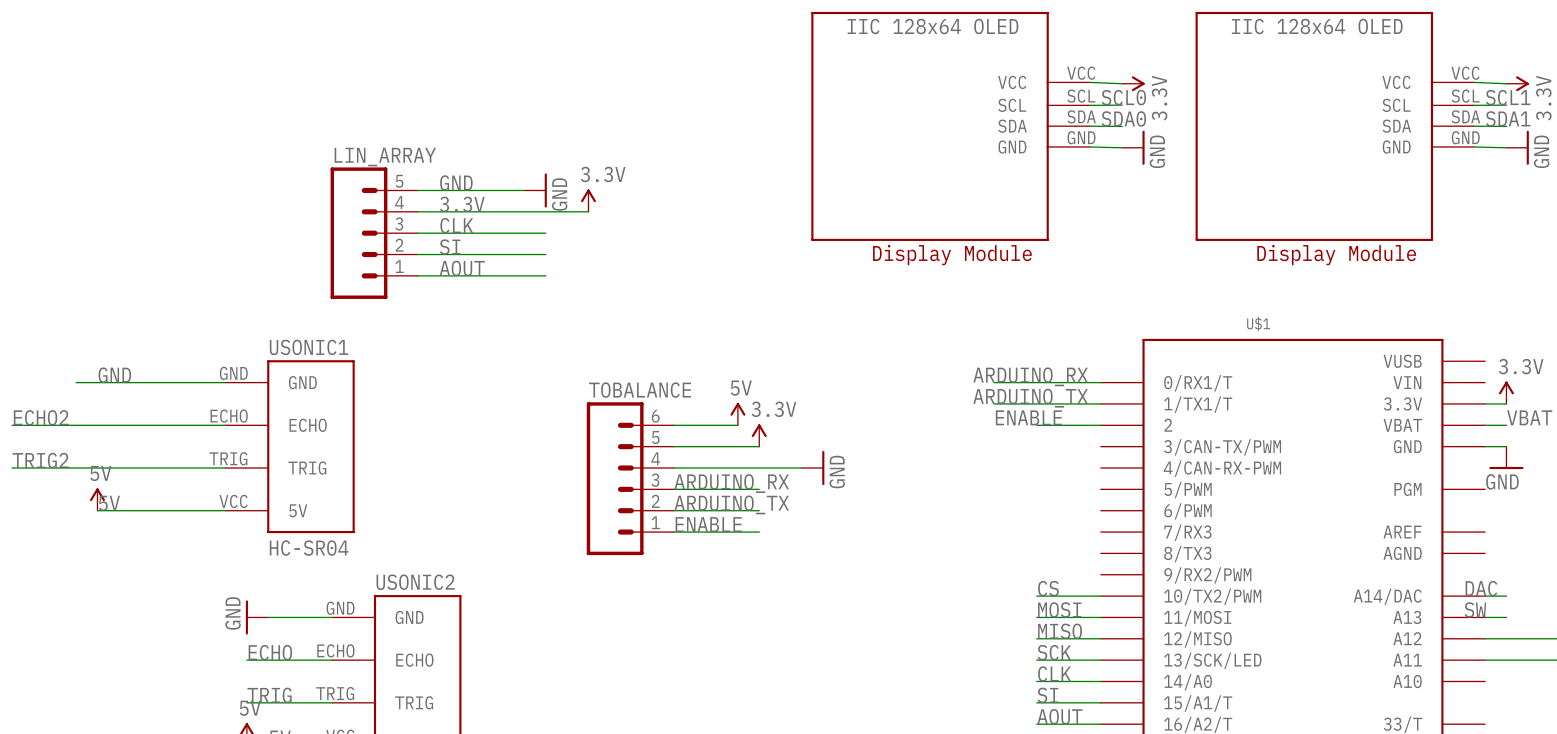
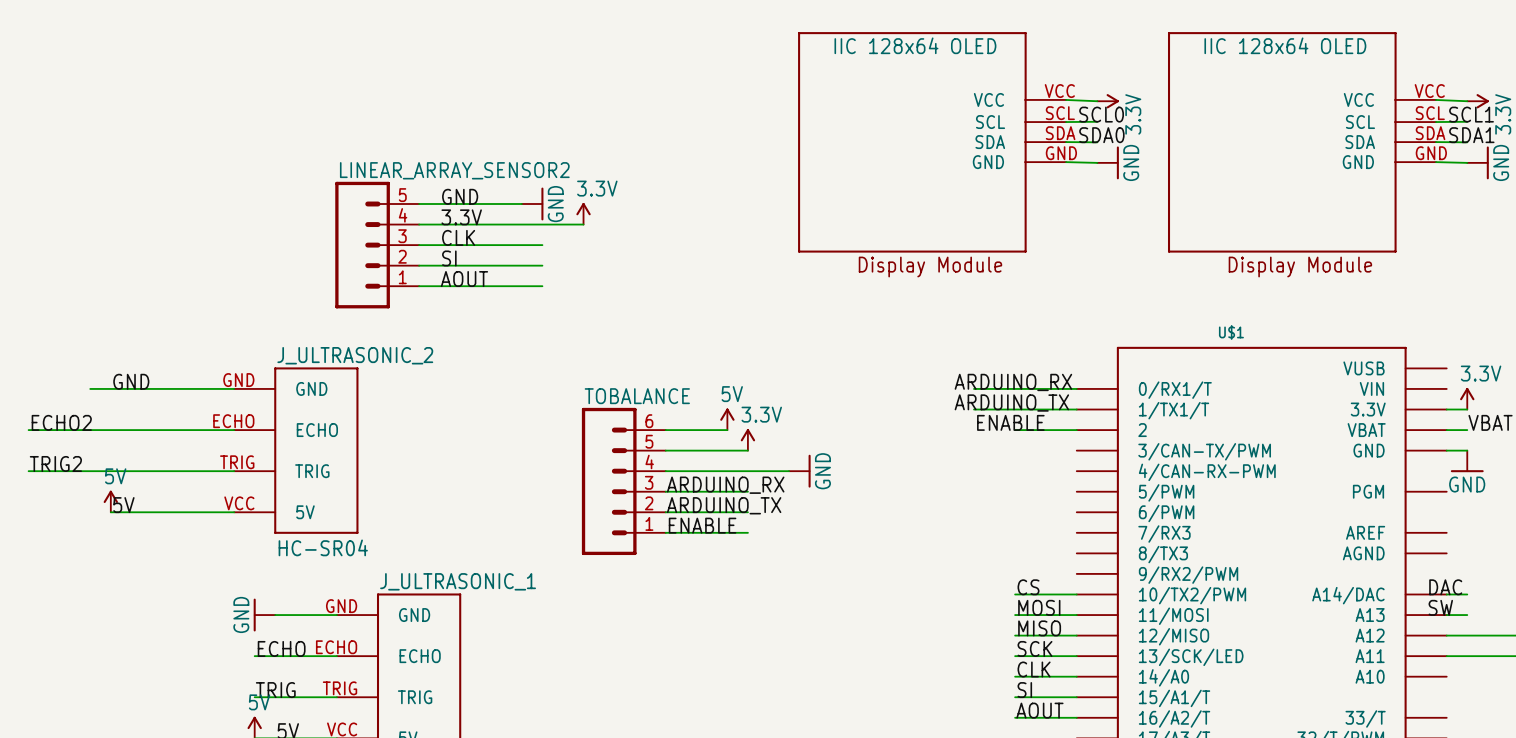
LIN_ARRAY name: LIN_ARRAY (385, 157) -> LINEAR_ARRAY_SENSOR2 (454, 170)
USONIC1 name: USONIC1 (309, 347) -> J_ULTRASONIC_2 (355, 355)
USONIC2 name: USONIC2 (415, 582) -> J_ULTRASONIC_1 (458, 581)

